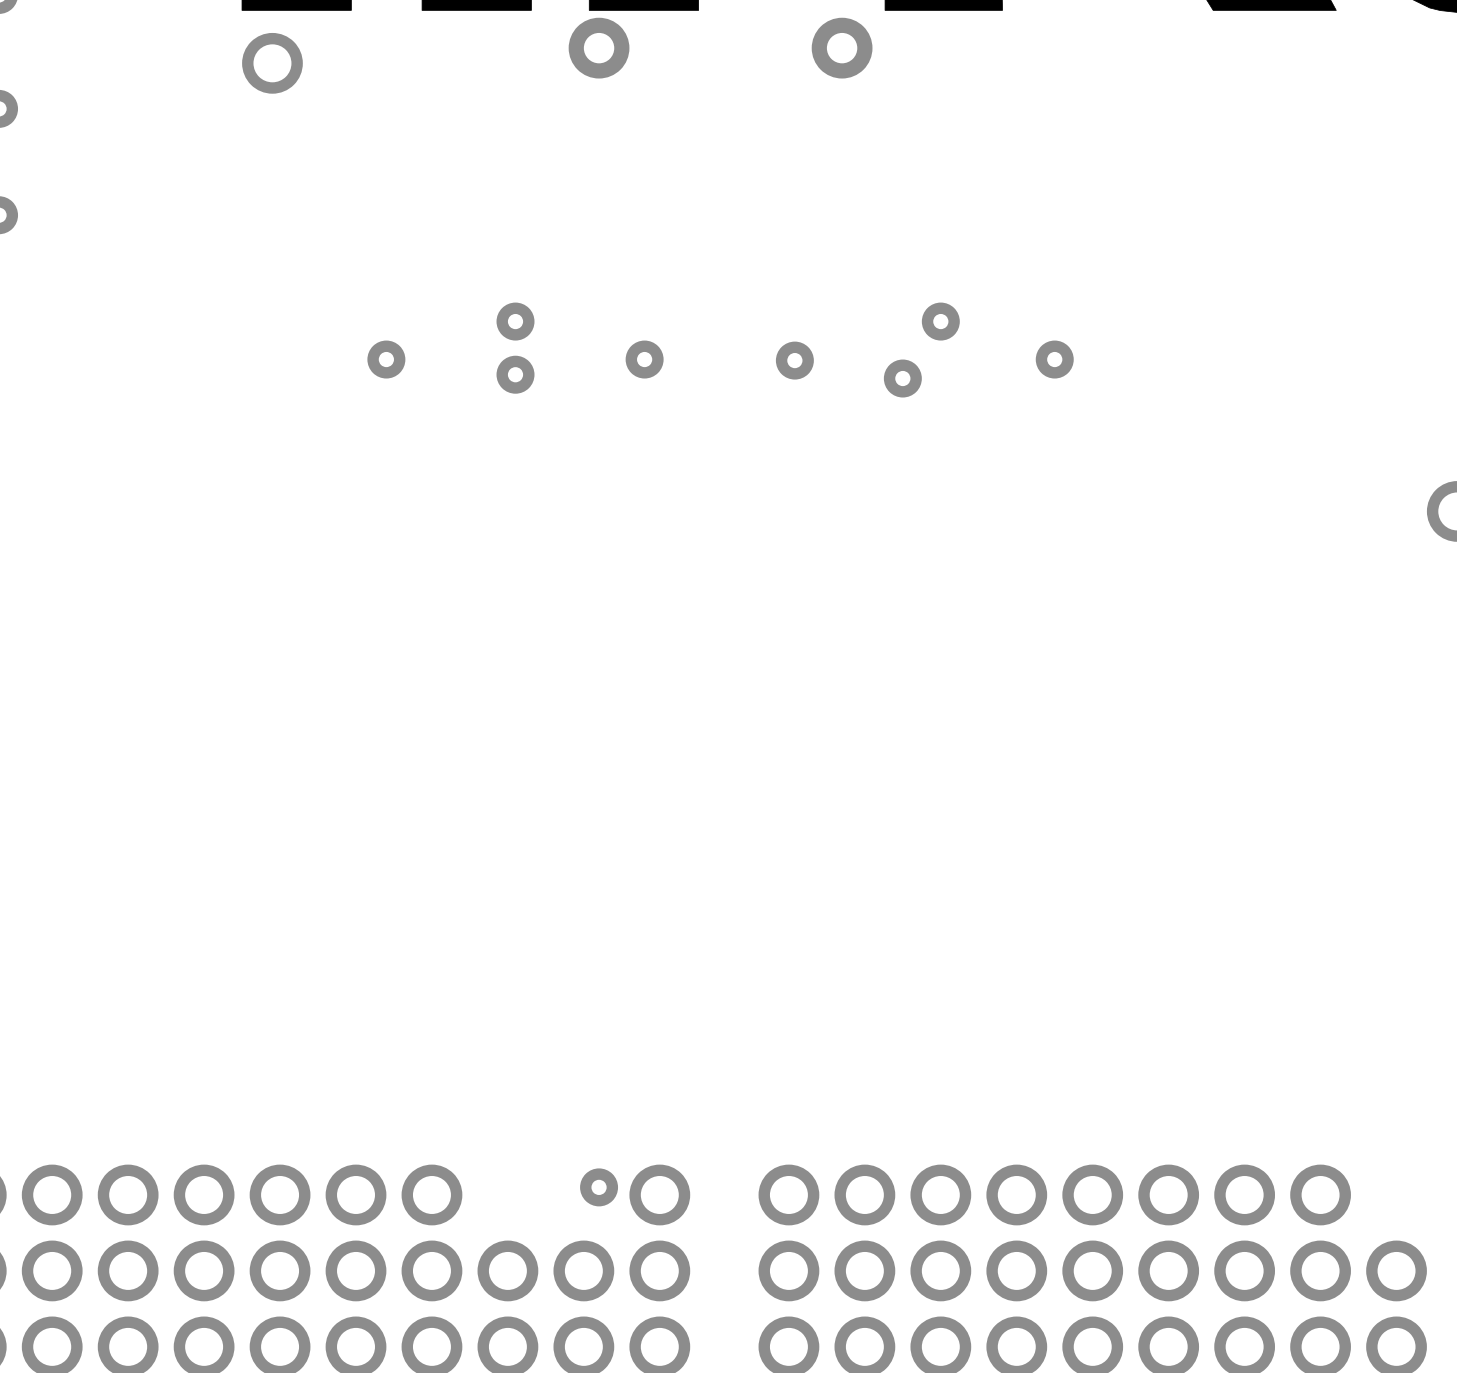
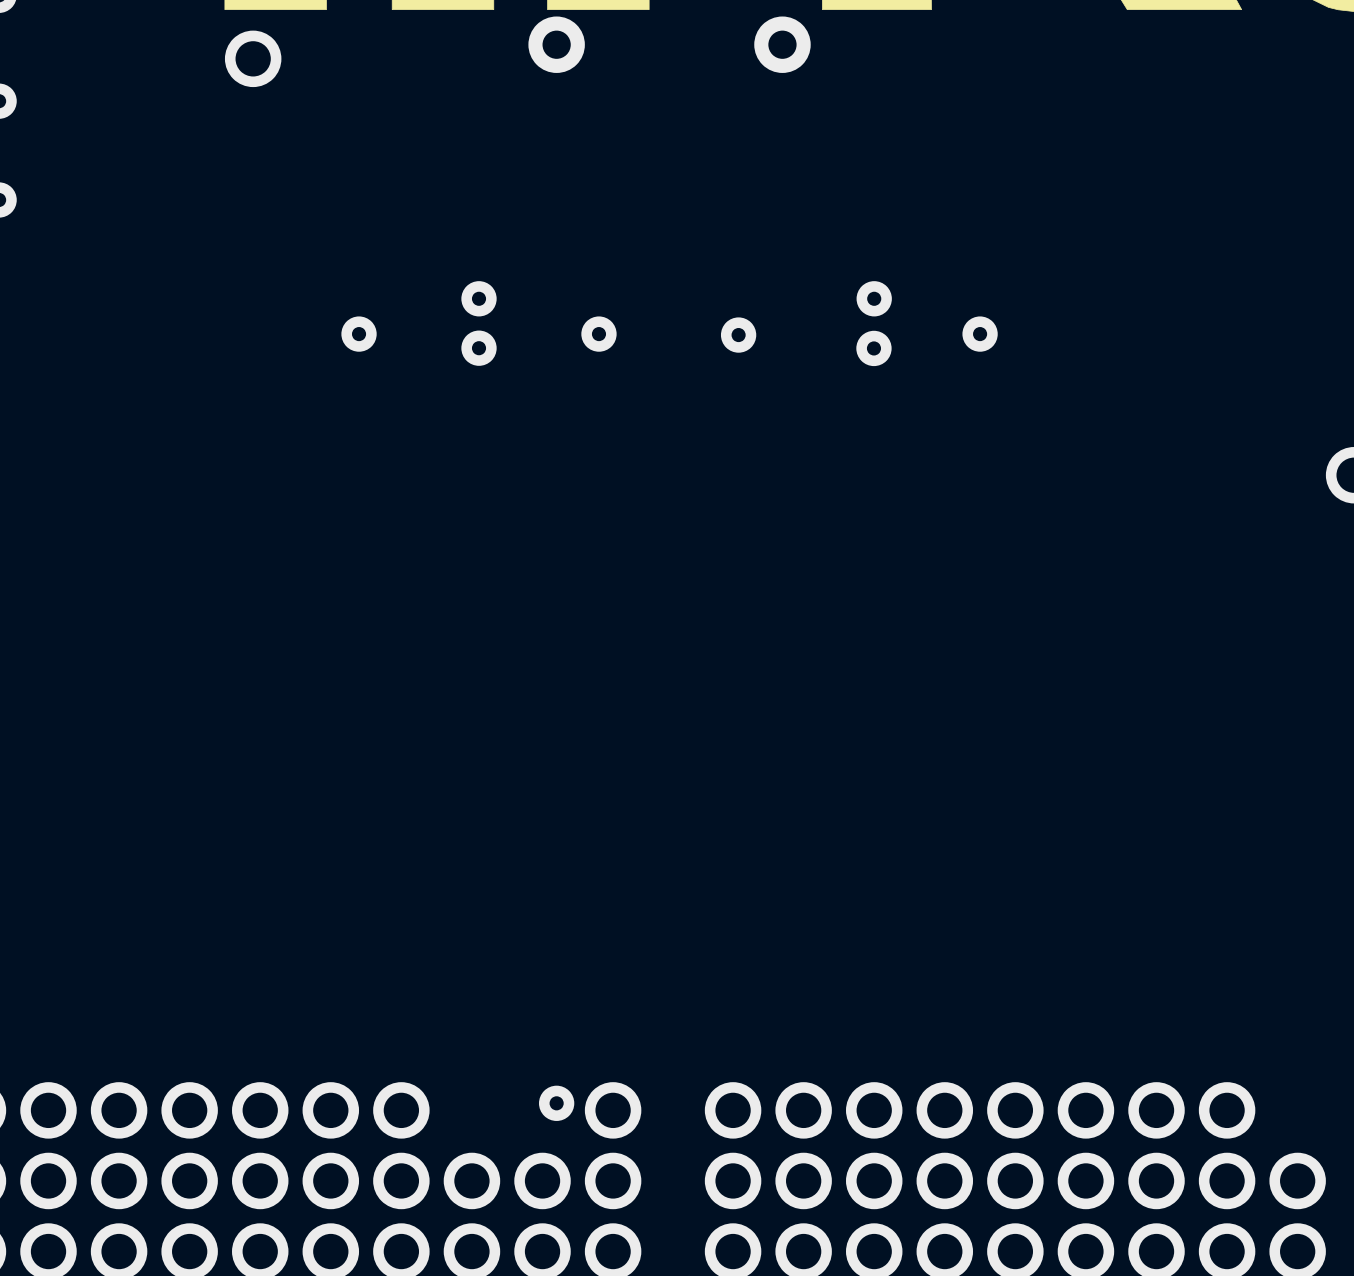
via position: (902, 378) -> (873, 348)

